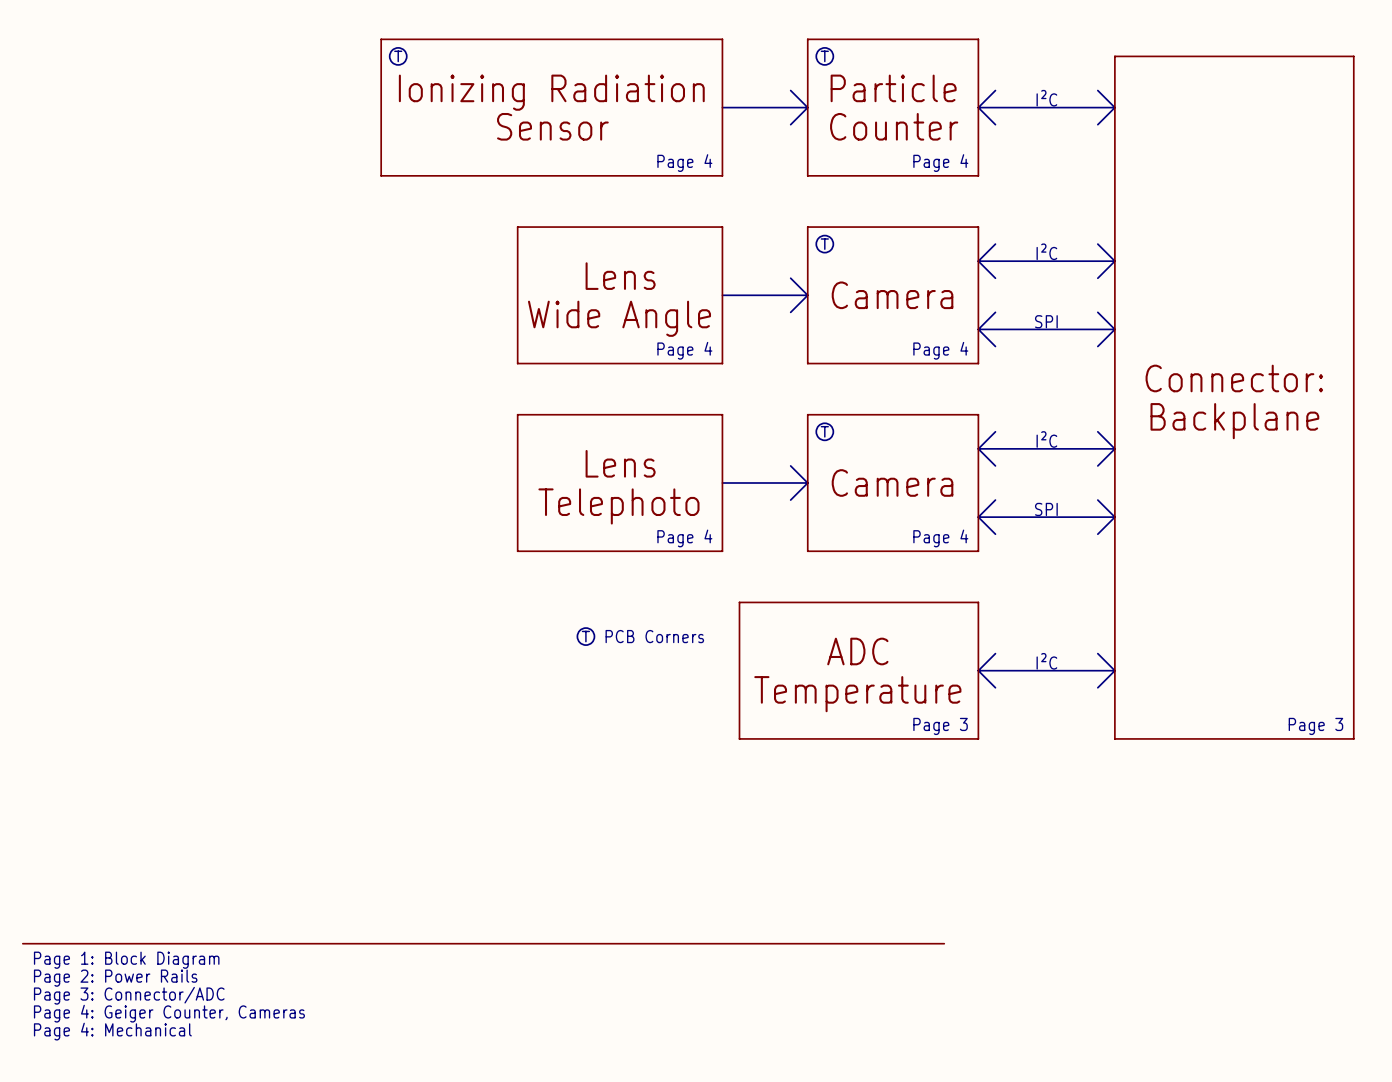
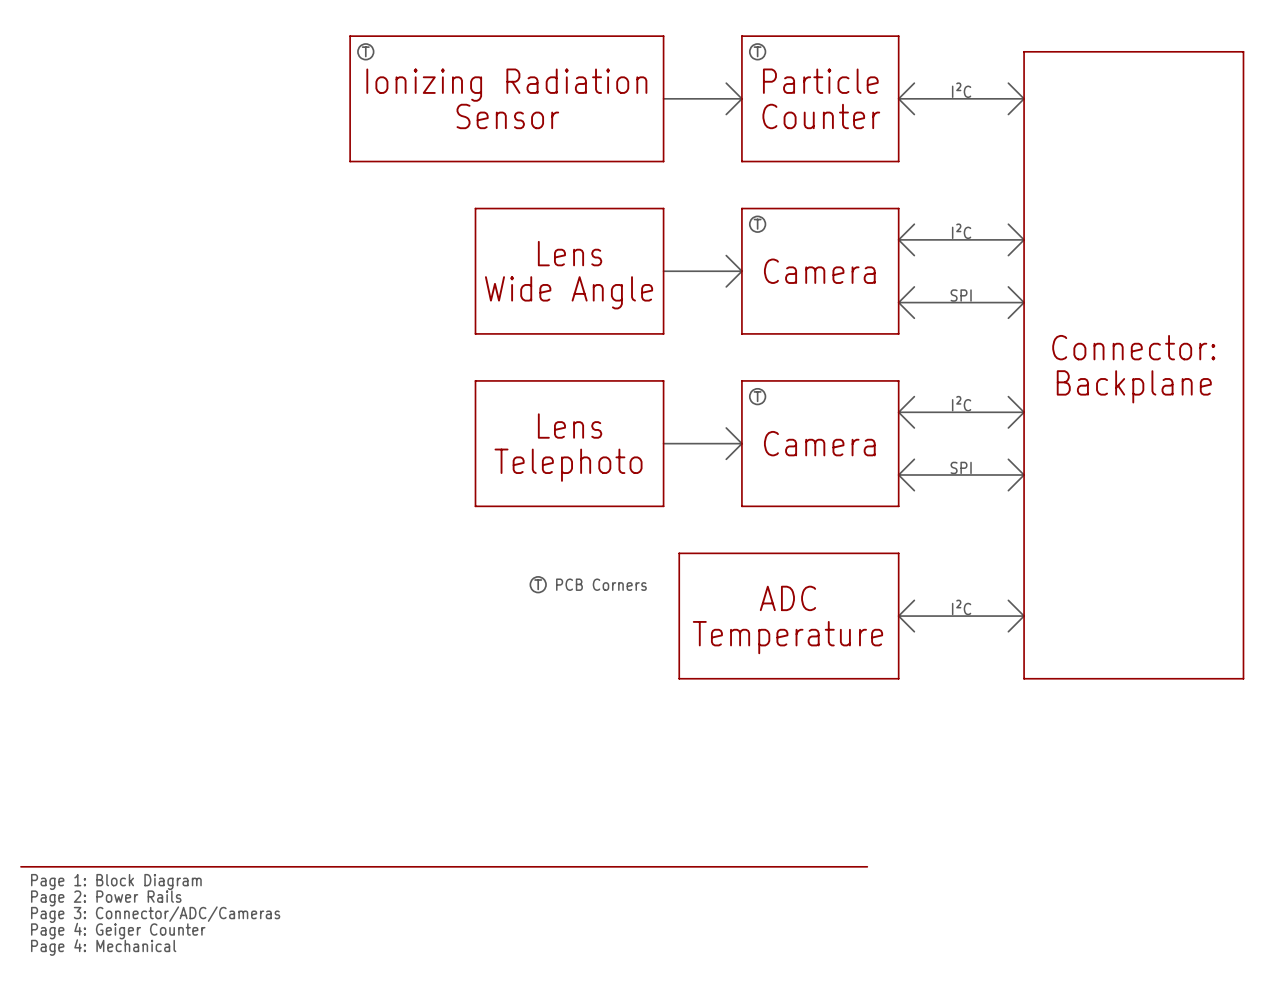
text: Page 4 (684, 163) -> none
text: Page 4 (940, 163) -> none
text: Page 4 (684, 350) -> none
text: Page 4 (940, 350) -> none
text: Page 4 (684, 538) -> none
text: Page 4 (940, 538) -> none
text: Page 3 (940, 726) -> none
text: Page 3 (1315, 726) -> none
text: Page 3: Connector/ADC (129, 995) -> Page 3: Connector/ADC/Cameras (155, 914)
text: Page 4: Geiger Counter, Cameras (169, 1013) -> Page 4: Geiger Counter (118, 931)

